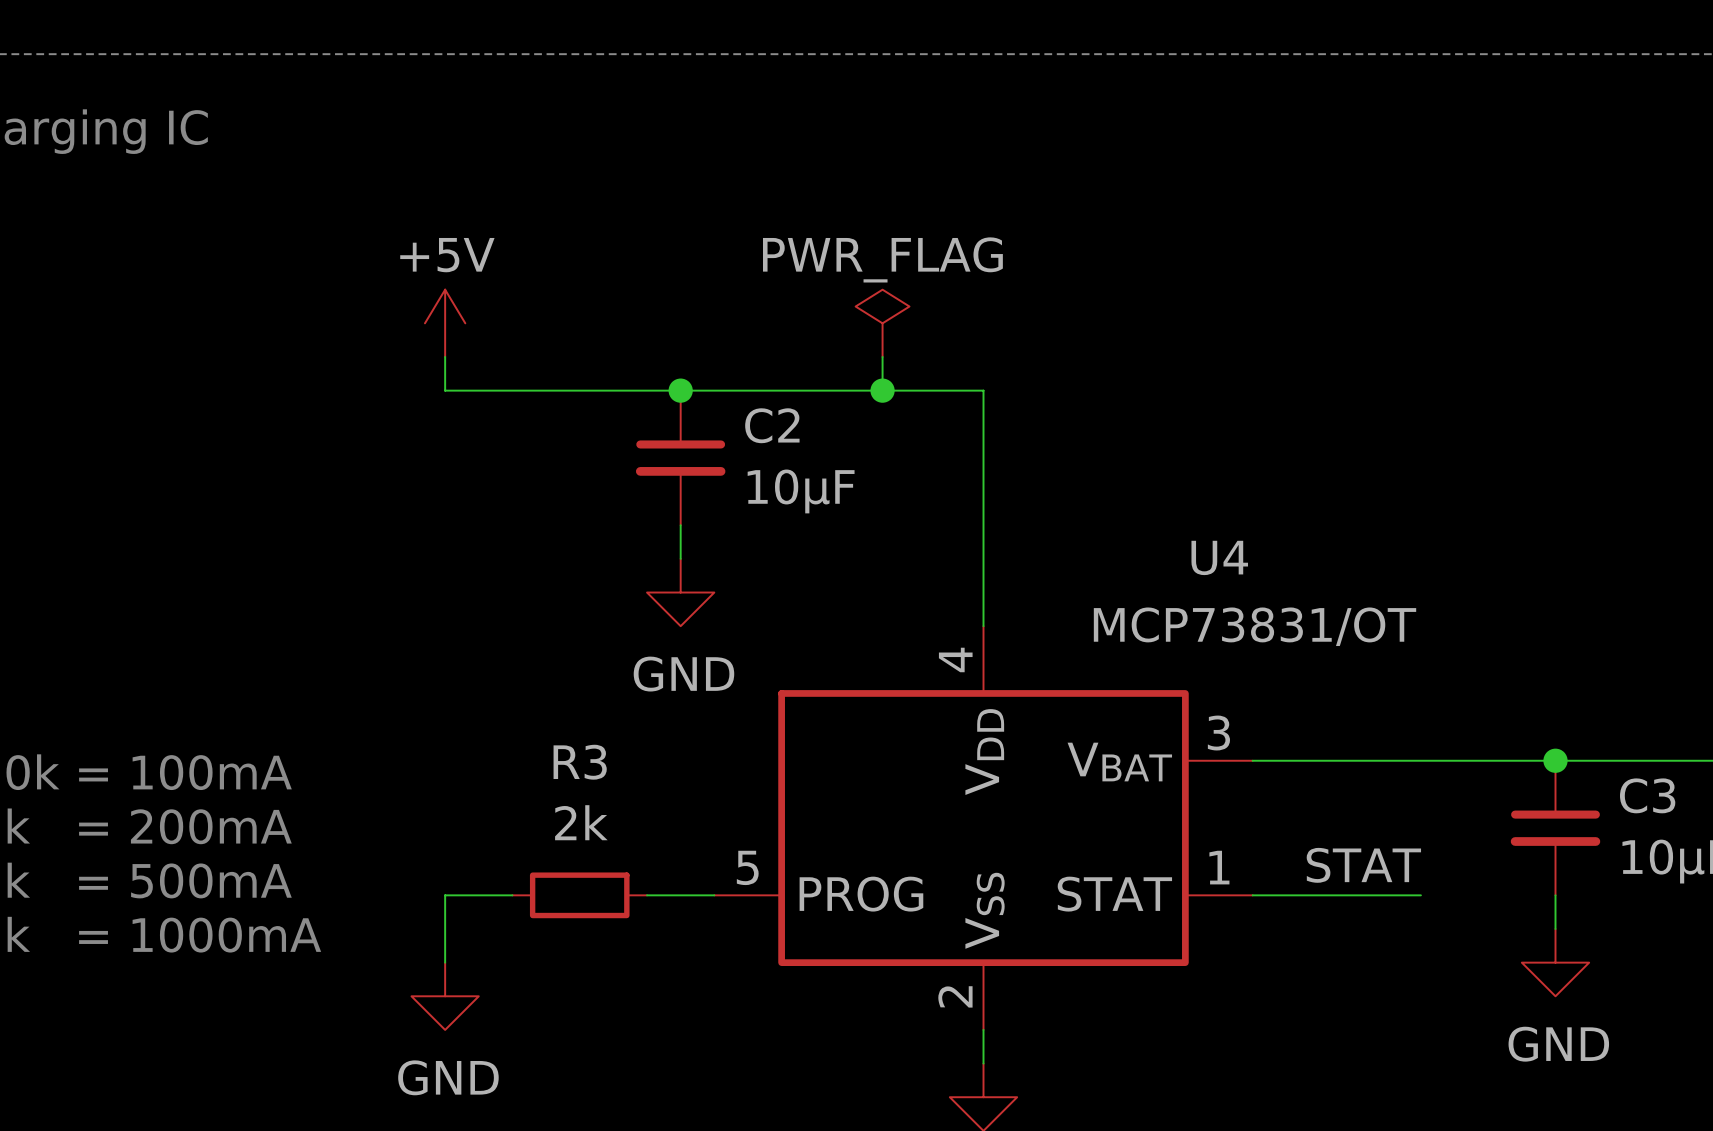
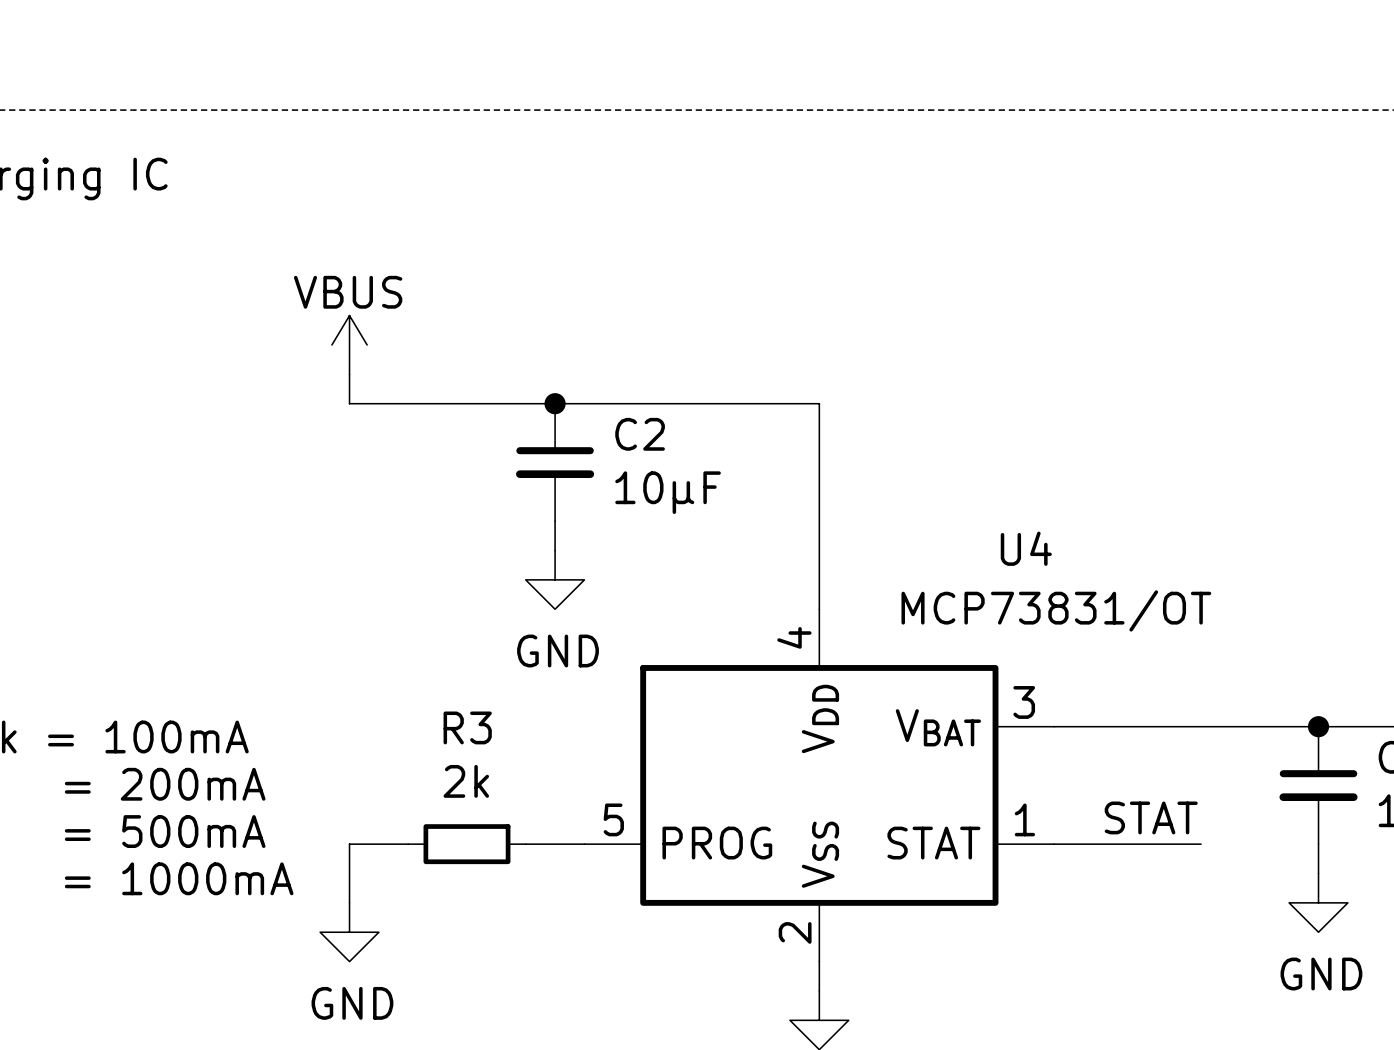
power symbol: +5V (445, 323) -> VBUS (349, 344)
power symbol: PWR_FLAG (882, 323) -> none
wire: (882, 356) (882, 390) -> none
junction: (882, 390) -> none

